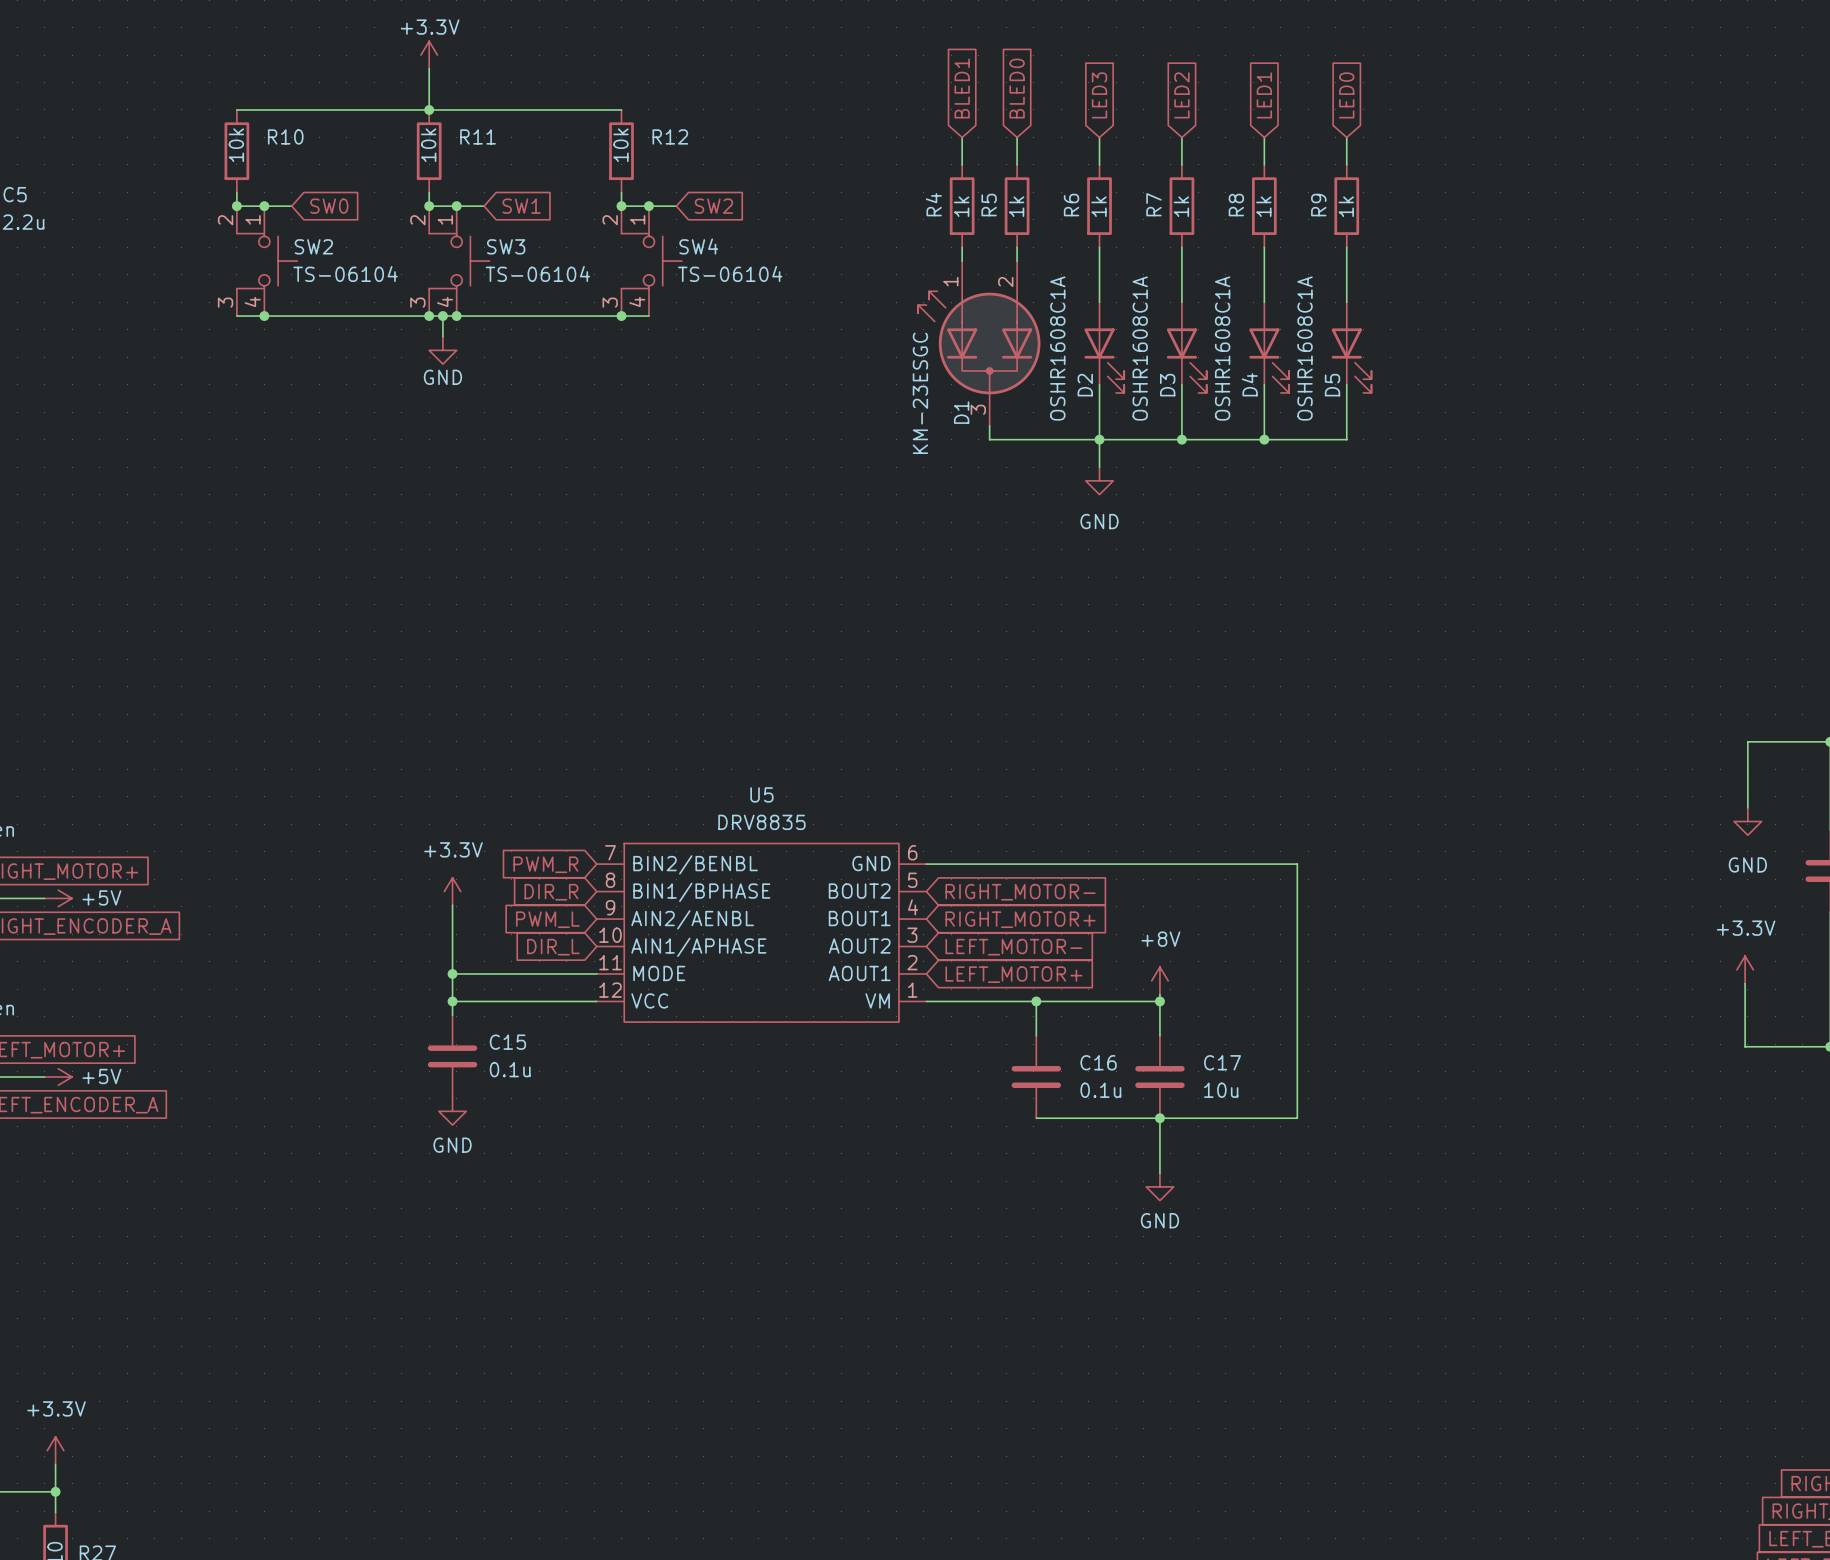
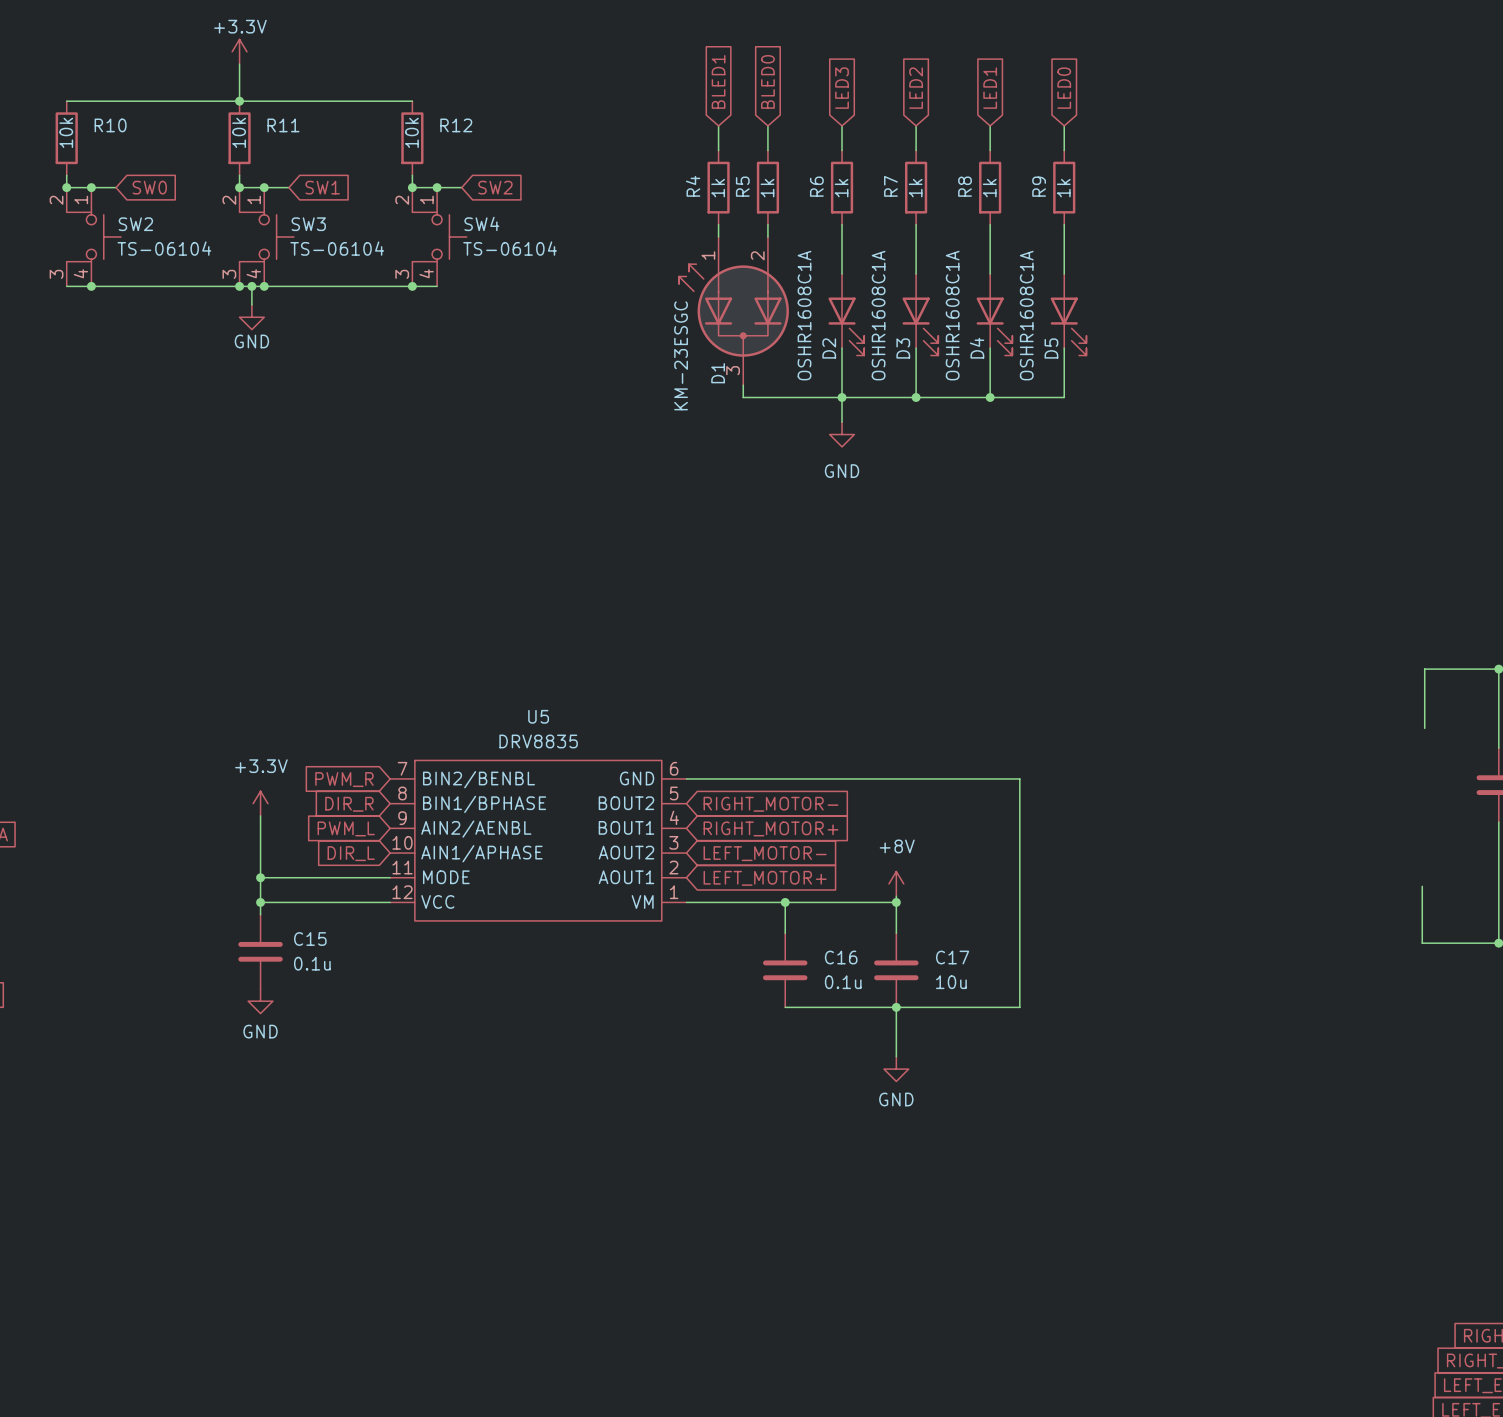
power symbol: GND (1747, 821) -> none
power symbol: +3.3V (1745, 969) -> none

